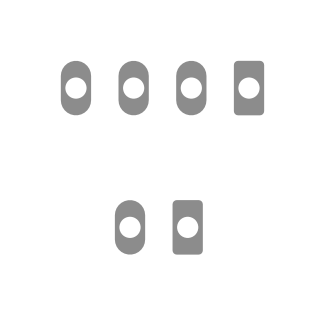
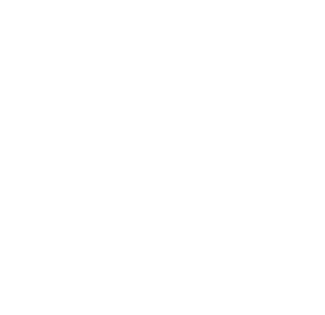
part: (162, 88) -> none
part: (158, 227) -> none

